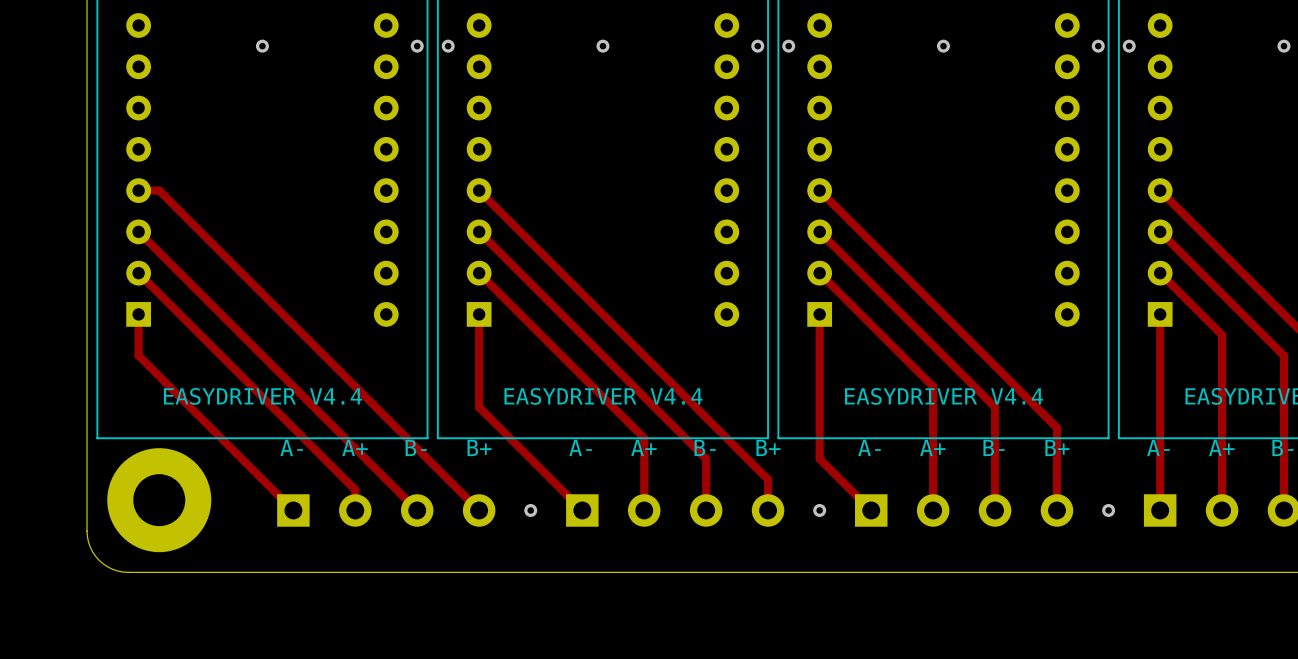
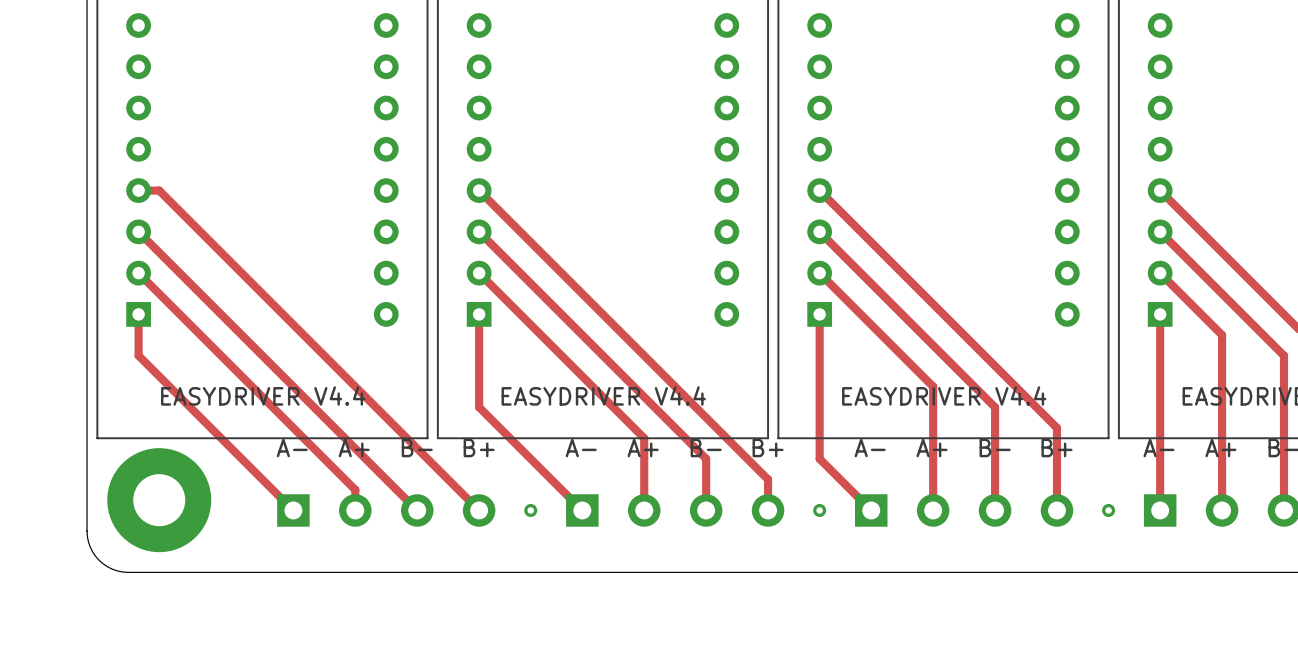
via: (262, 46) -> none
via: (417, 46) -> none
via: (448, 46) -> none
via: (602, 46) -> none
via: (757, 46) -> none
via: (788, 46) -> none
via: (943, 46) -> none
via: (1098, 46) -> none
via: (1129, 46) -> none
via: (1283, 46) -> none

